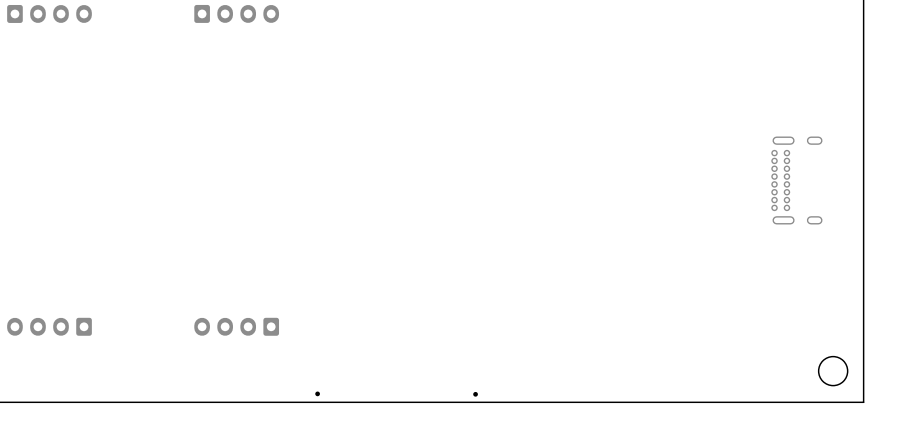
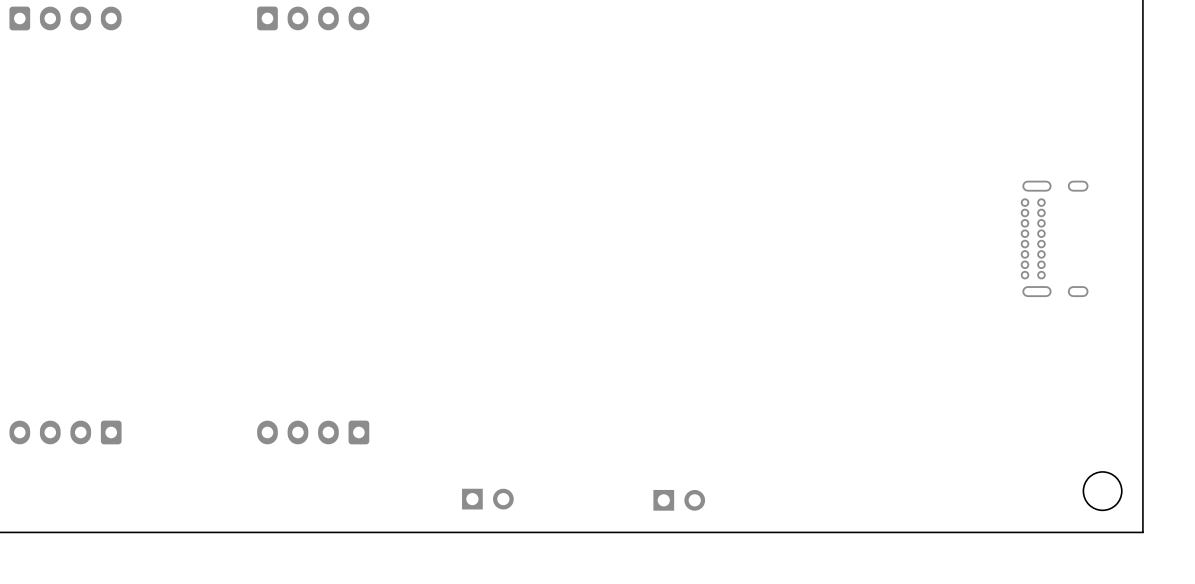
part: none -> (487, 499)
part: none -> (679, 500)
part: (317, 393) -> none
part: (475, 394) -> none

